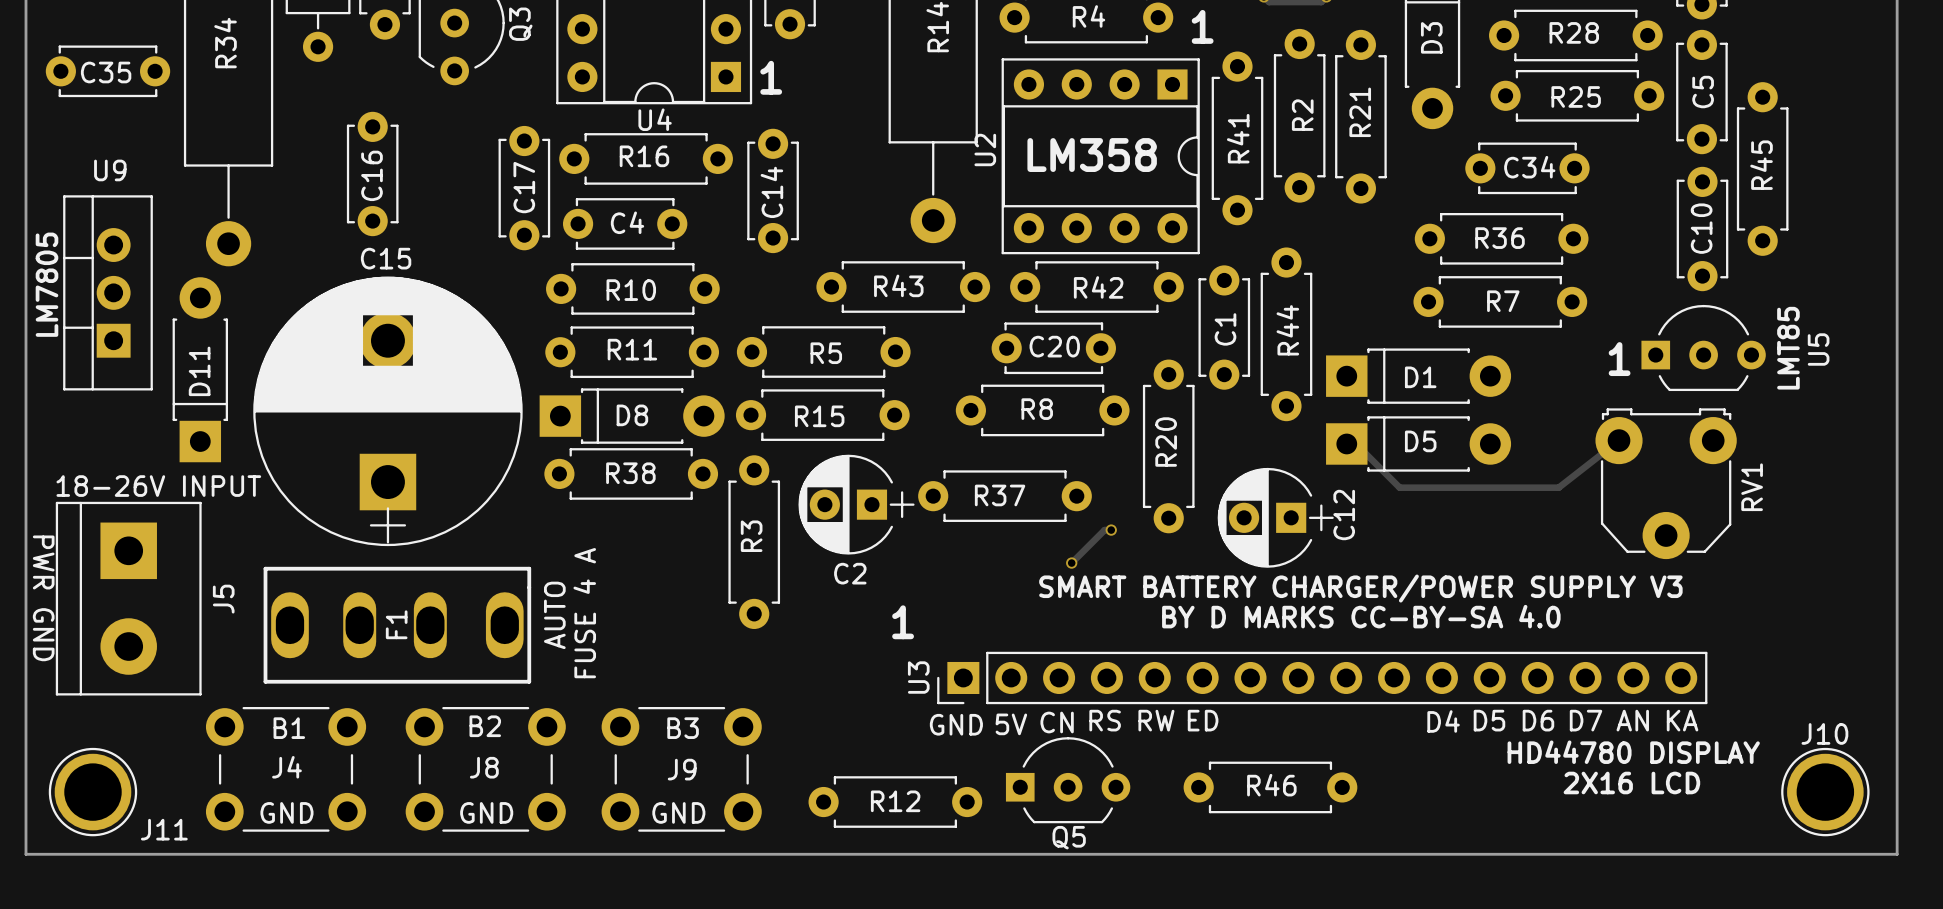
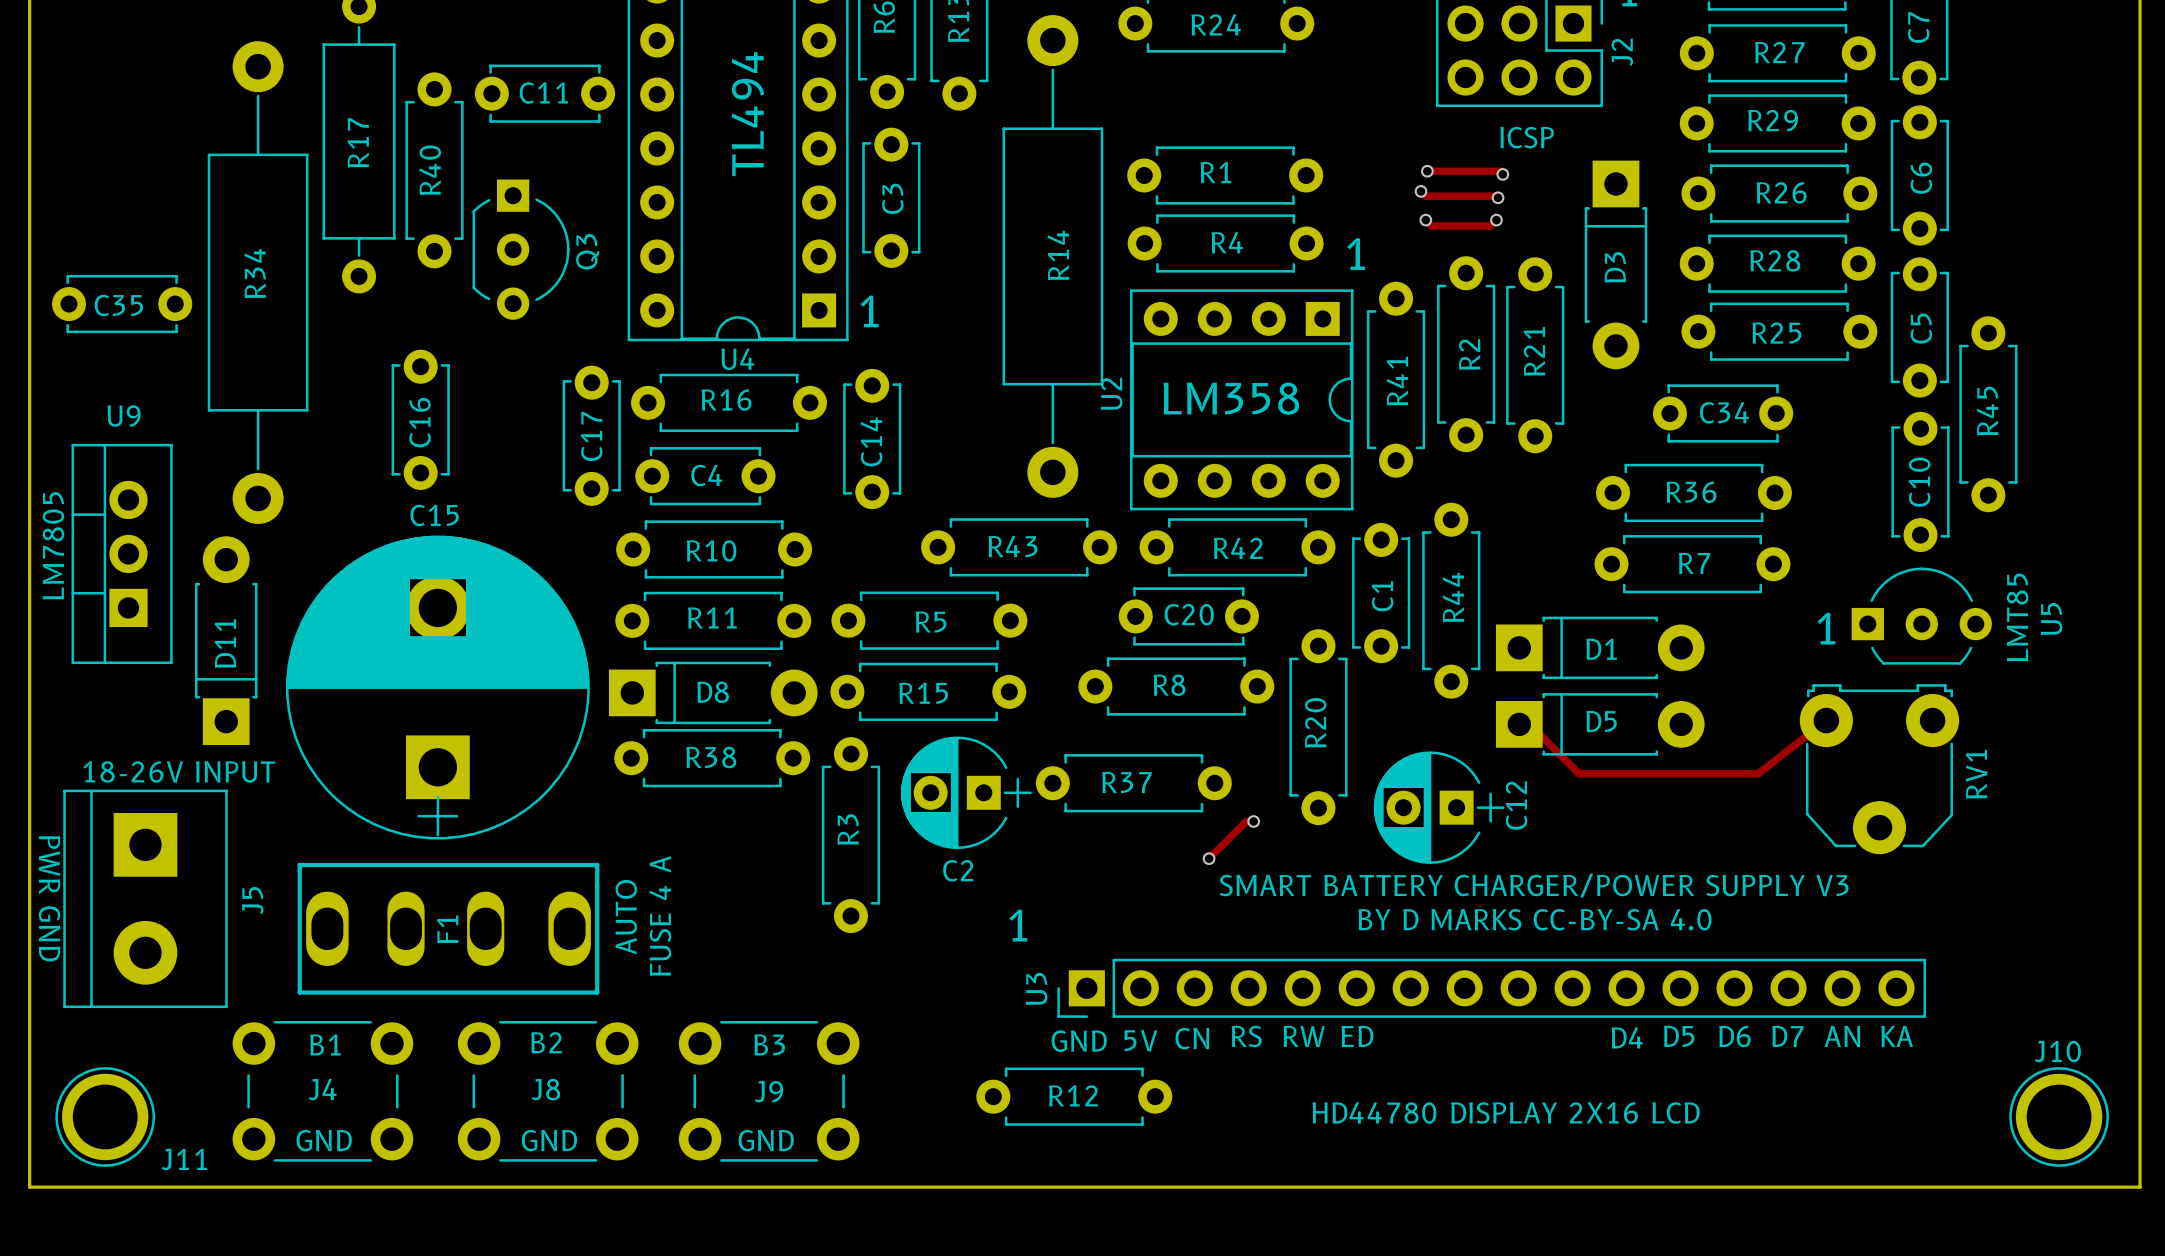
text: HD44780 DISPLAY (1633, 752) -> HD44780 DISPLAY 2X16 LCD (1506, 1112)
Q5: (1068, 780) -> none
text: 2X16 LCD (1631, 782) -> none
R46: (1270, 787) -> none
R12 position: (895, 802) -> (1074, 1096)

